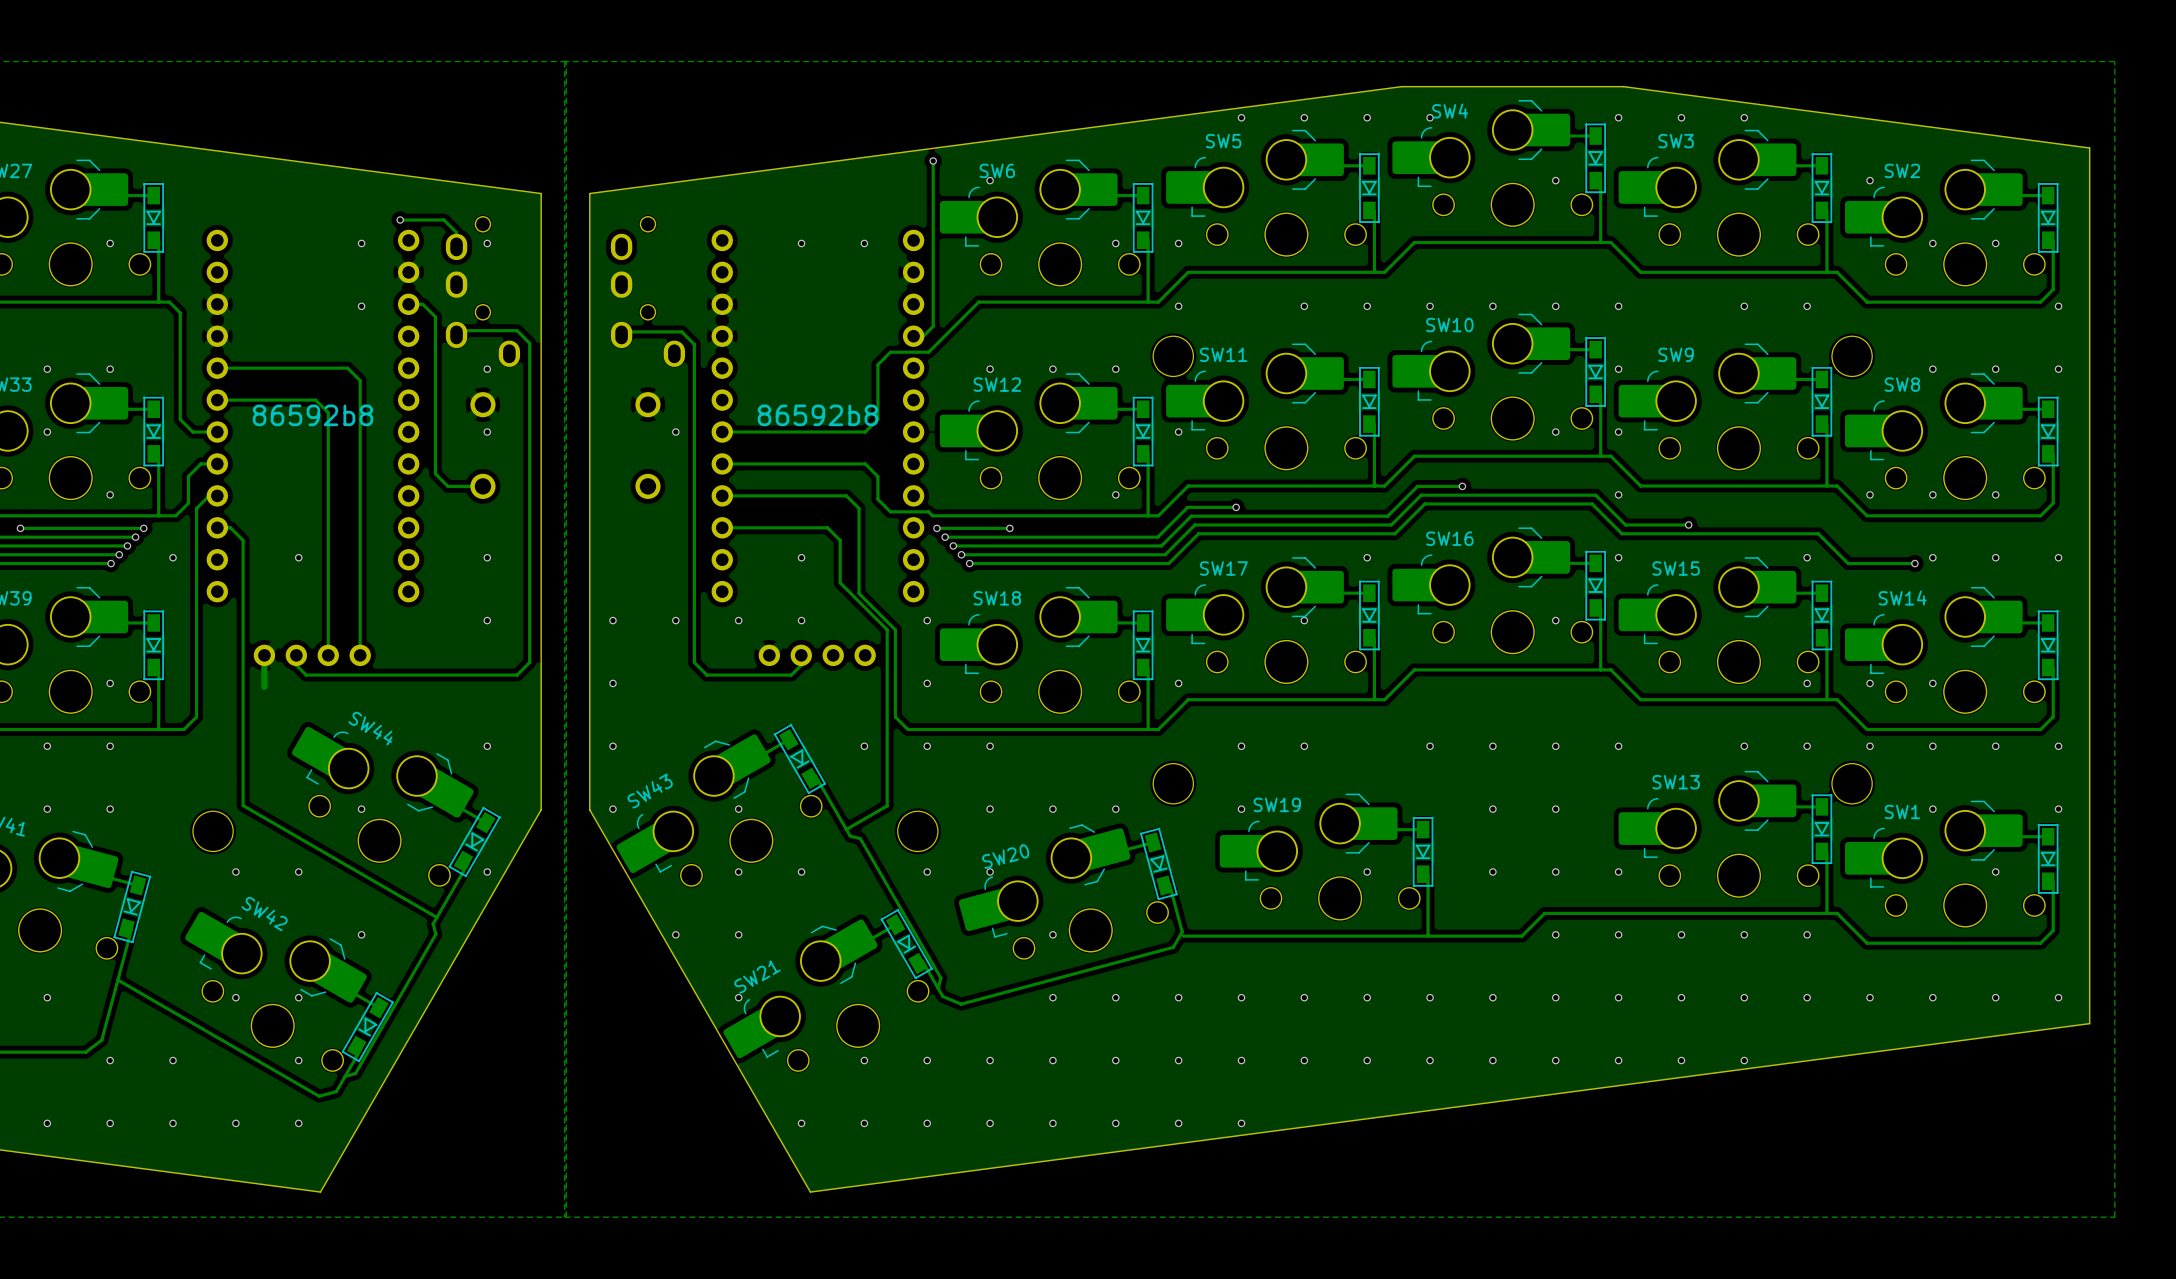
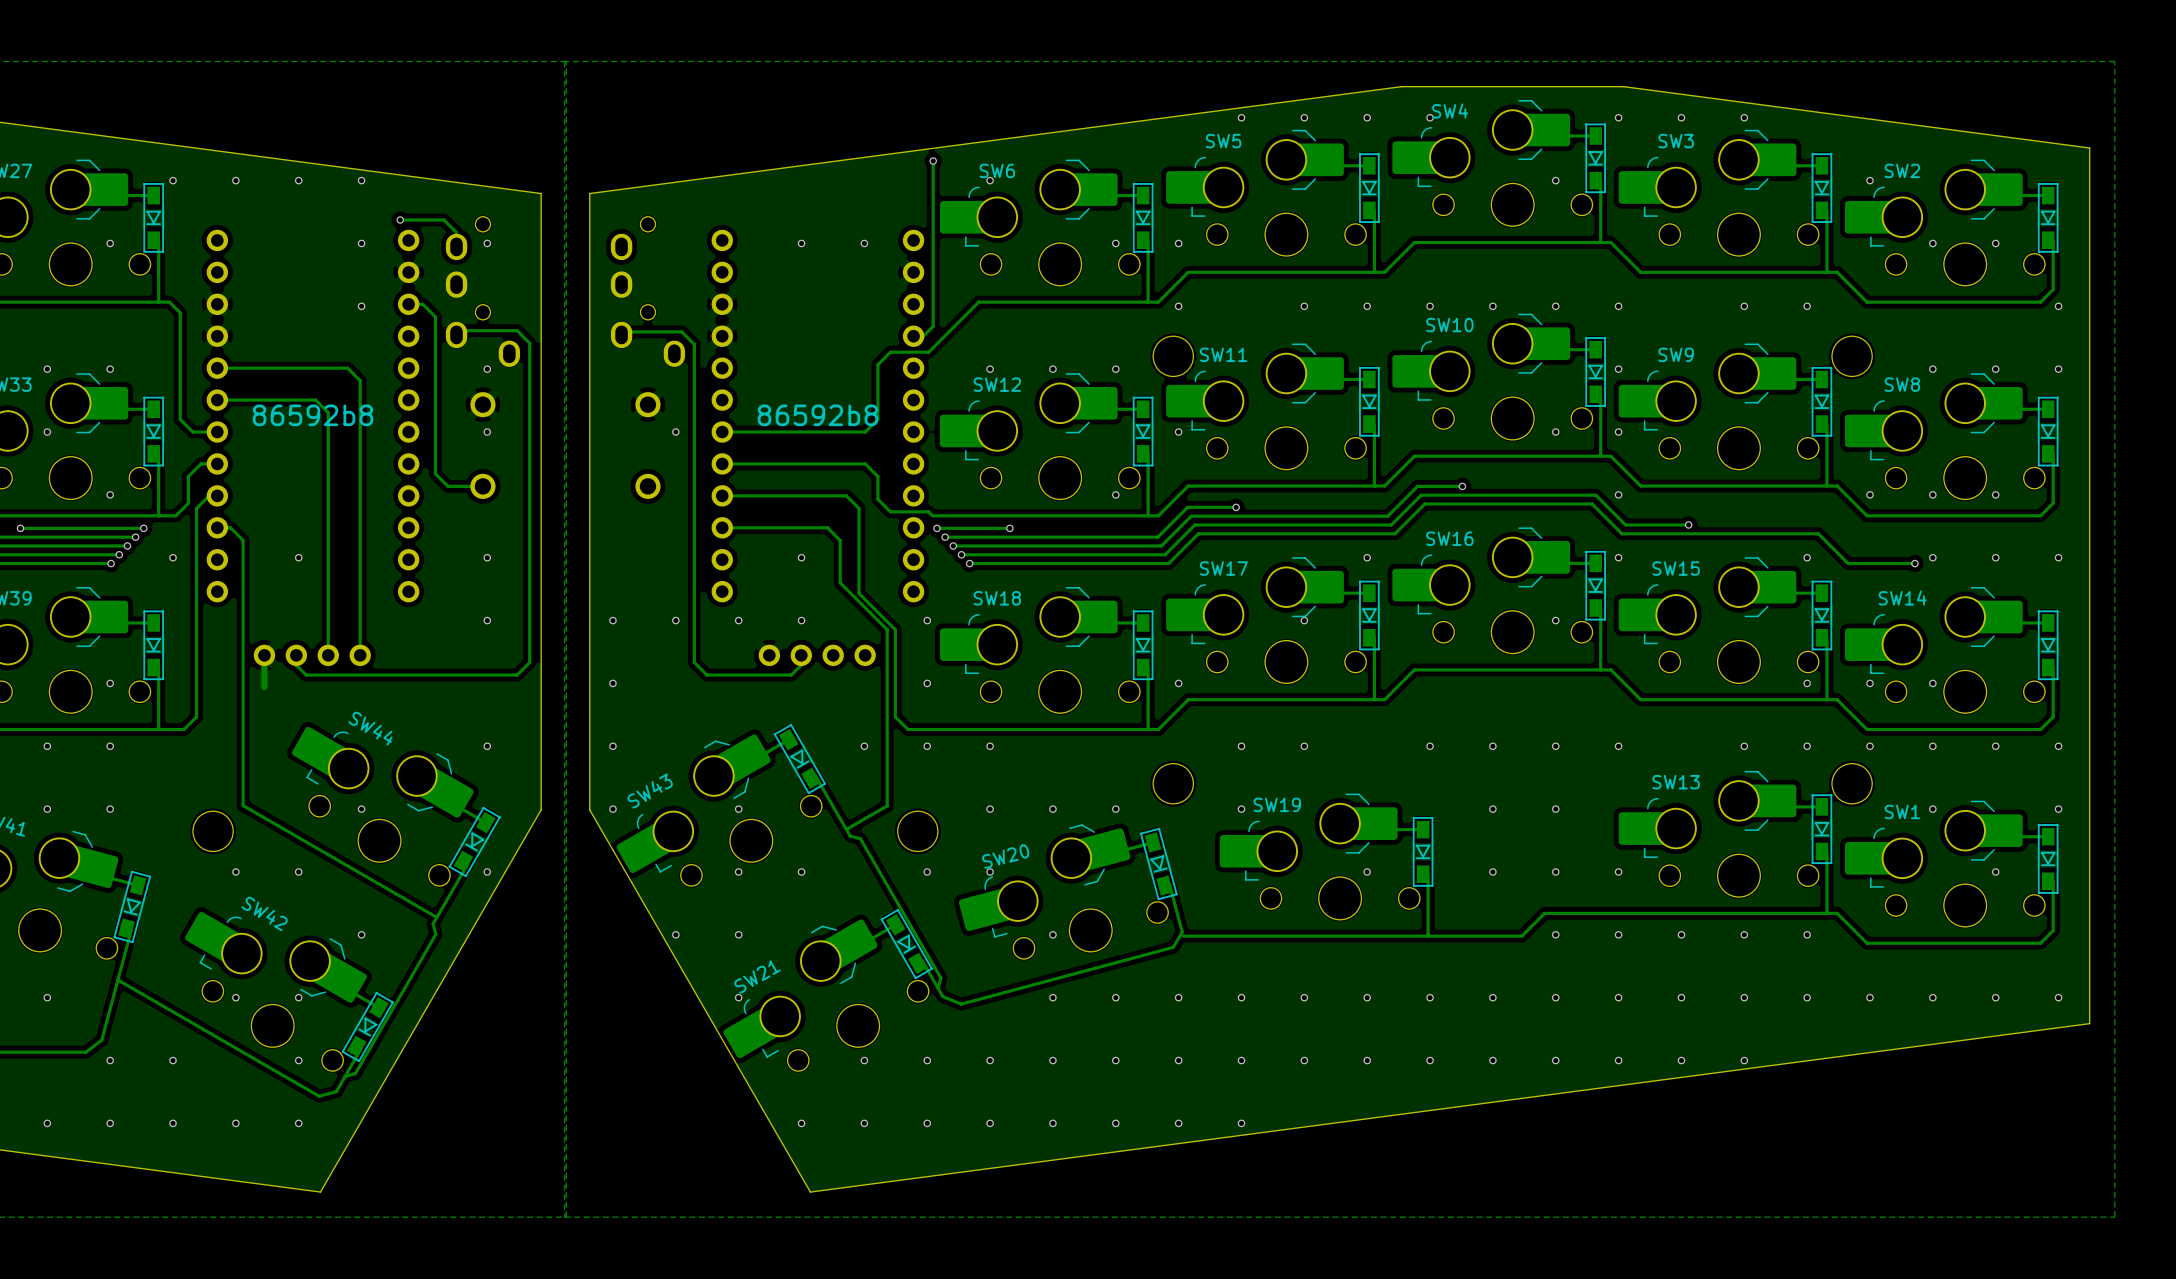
via: none -> (173, 180)
via: none -> (235, 180)
via: none -> (298, 180)
via: none -> (361, 180)

